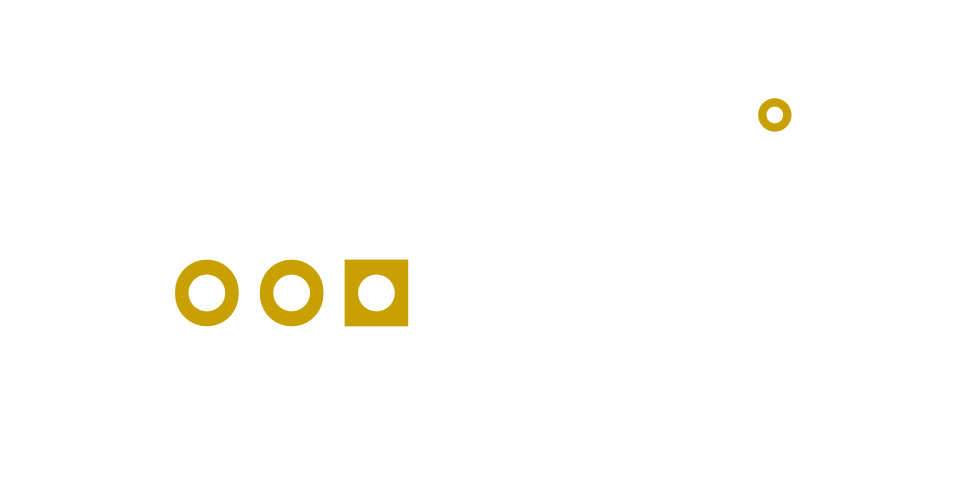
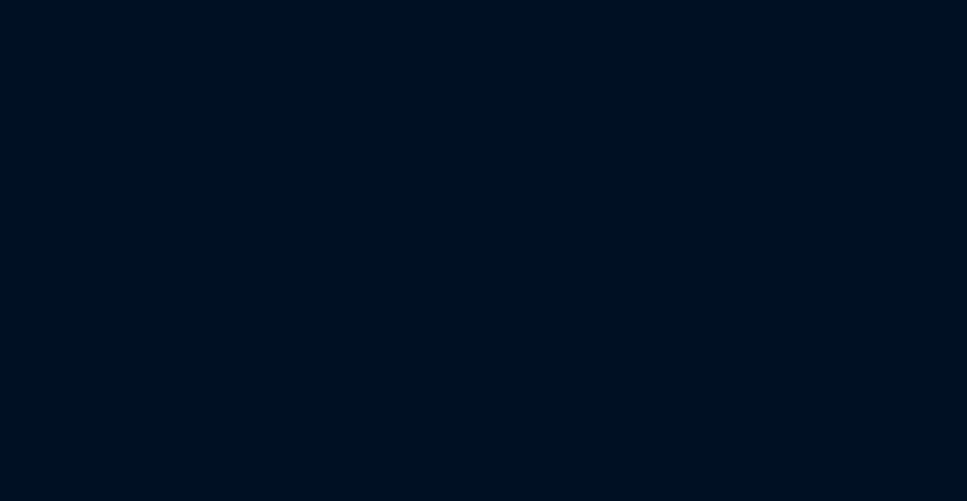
part: (774, 114) -> none
part: (291, 292) -> none

